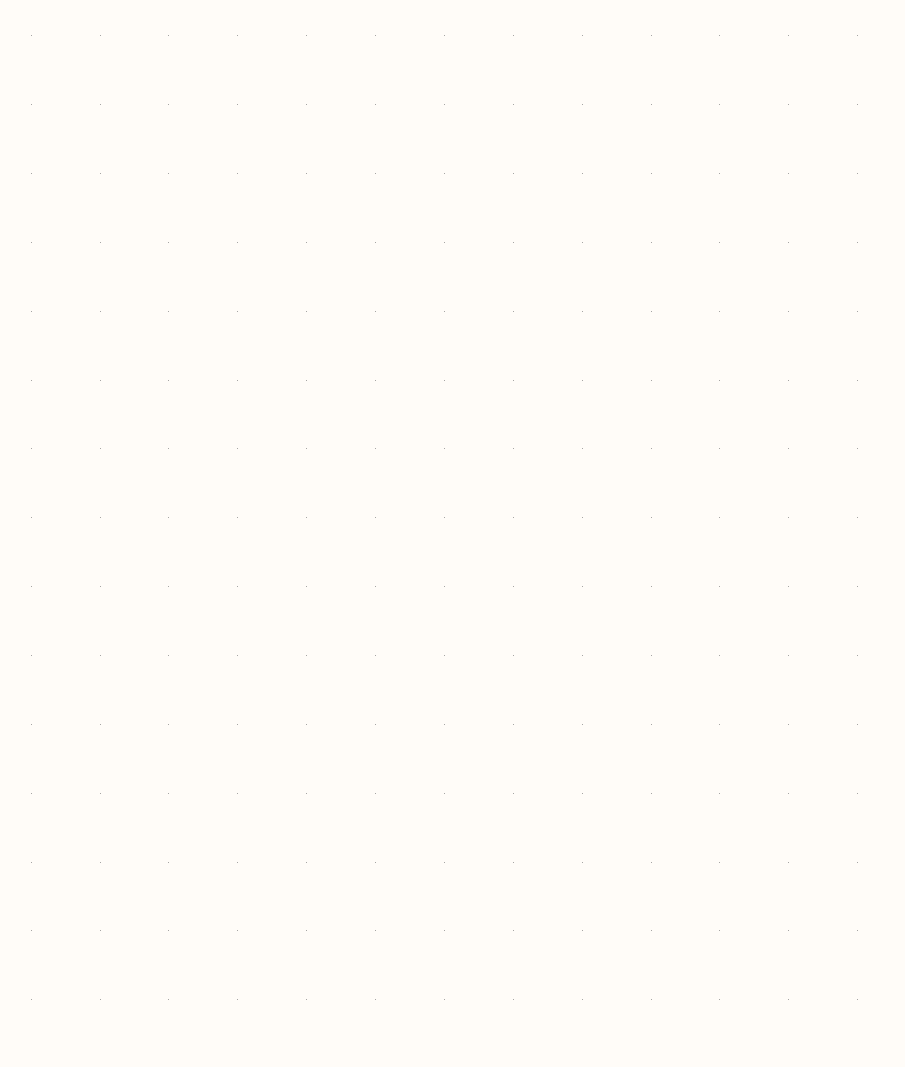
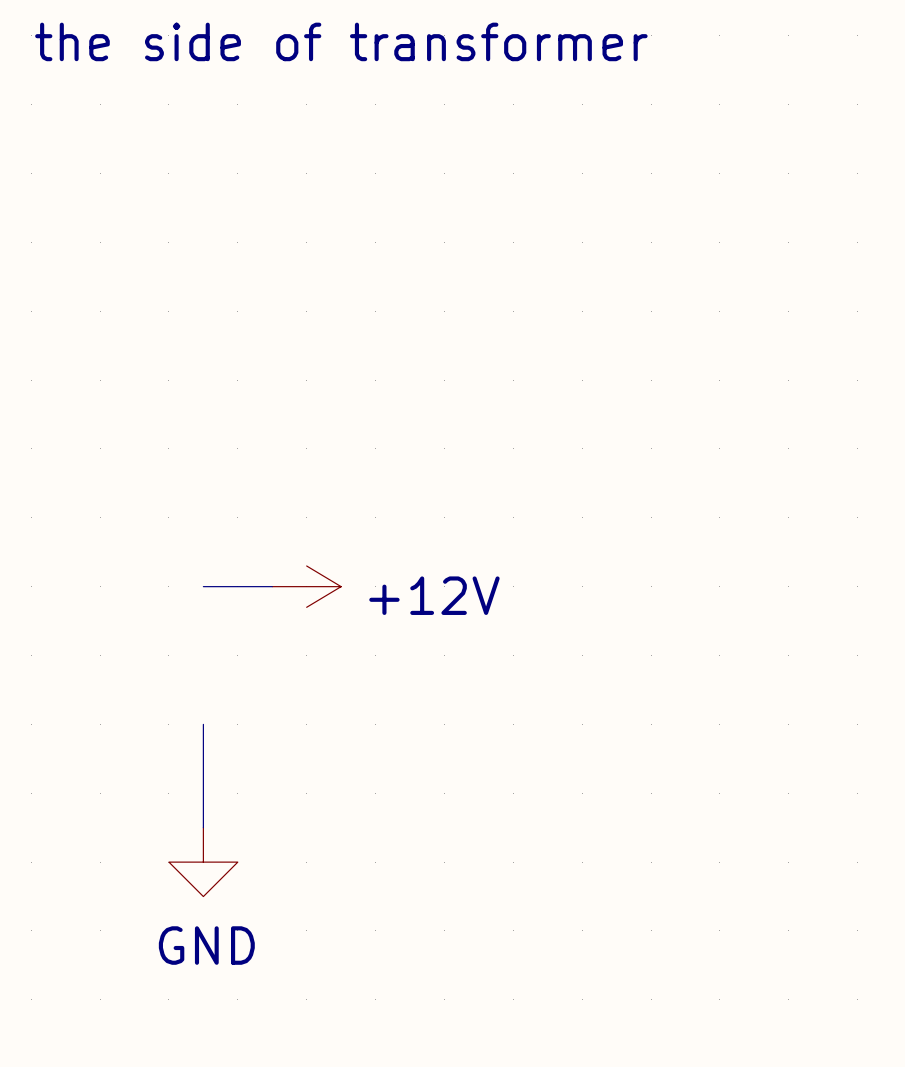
text: none -> the side of transformer (341, 41)
wire: none -> (203, 586) (272, 586)
power symbol: none -> +12V (306, 586)
wire: none -> (203, 724) (203, 827)
power symbol: none -> GND (203, 862)

